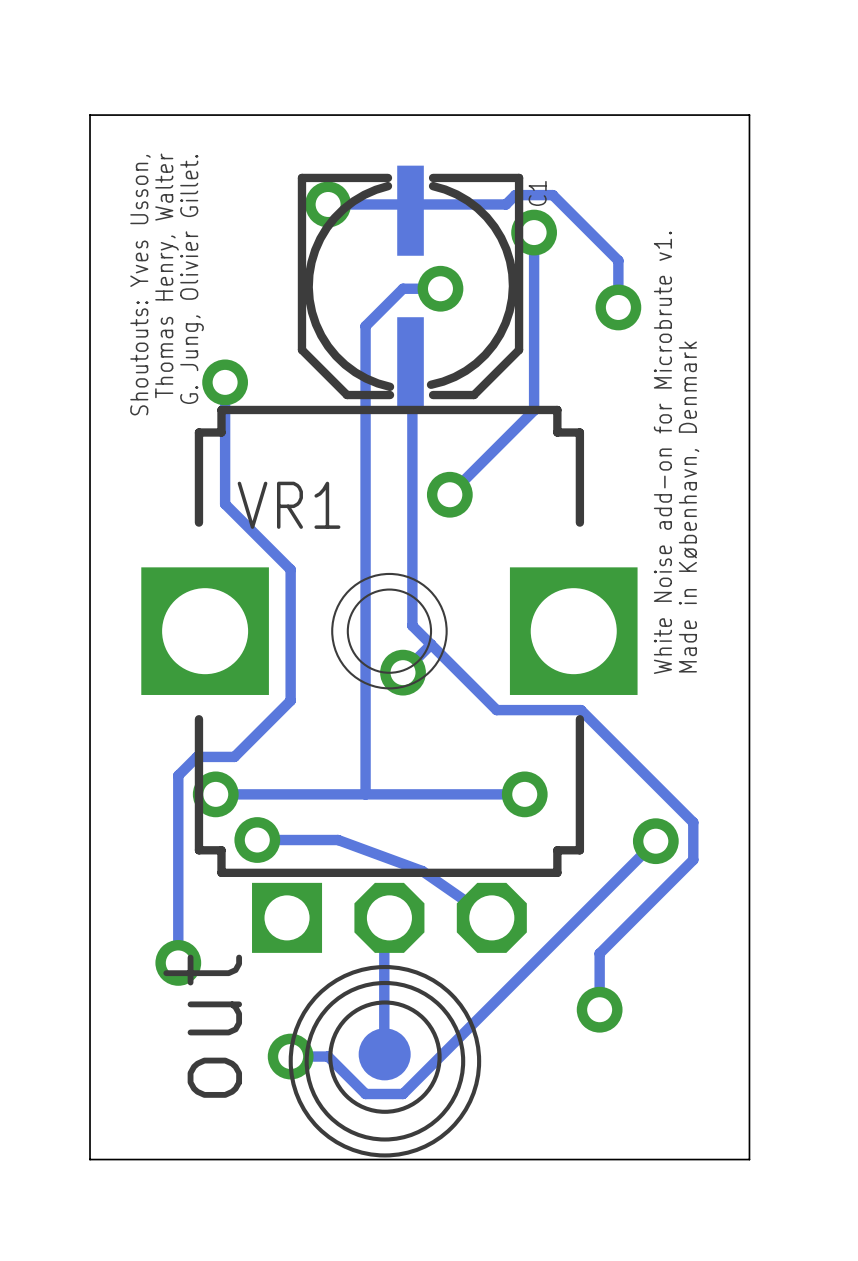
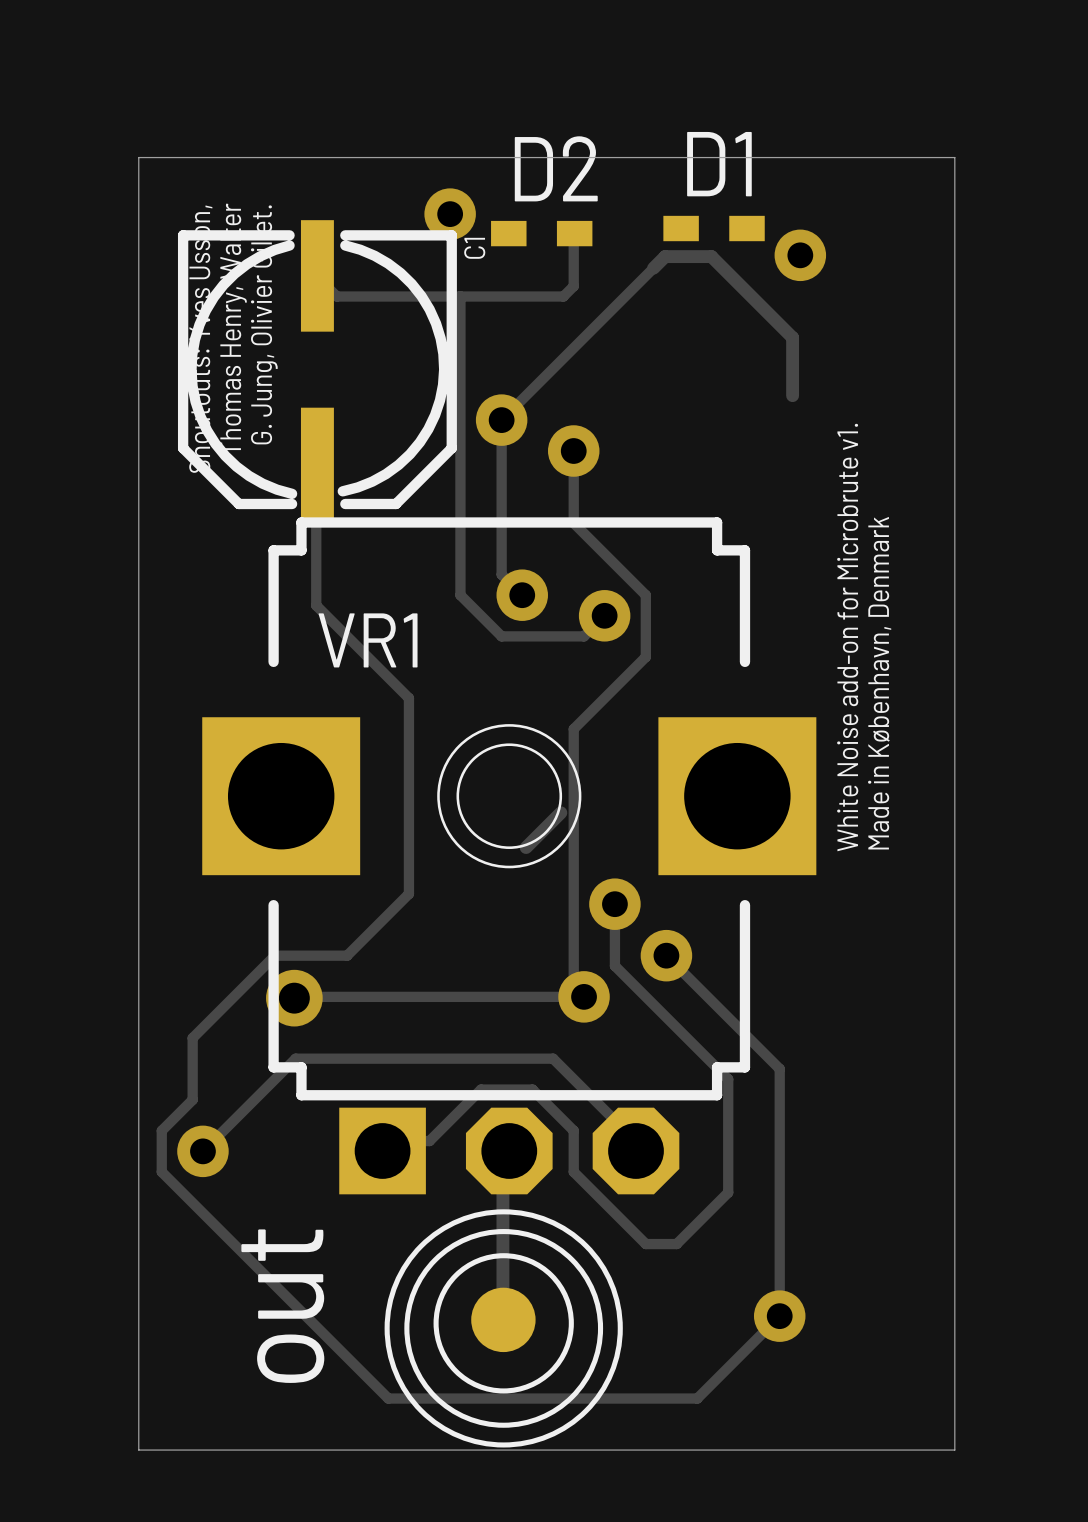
via: none -> (450, 214)
D1: none -> (714, 228)
D2: none -> (541, 233)
track: none -> (574, 233) (573, 286) (563, 296) (336, 296) (317, 275)
via: none -> (800, 255)
via: (328, 204) -> none
track: (506, 204) (412, 204) (410, 210) (403, 204) (328, 204) -> (653, 268) (501, 420) (501, 574) (522, 595)
track: none -> (460, 296) (460, 595) (501, 636) (584, 636) (604, 615)
track: (534, 232) (534, 410) (449, 494) -> none
via: (534, 232) -> none
C1 position: (410, 286) -> (317, 369)
track: (440, 288) (403, 288) (365, 326) (365, 794) -> none
via: (440, 288) -> none
via: (618, 307) -> none
via: none -> (501, 420)
track: none -> (573, 451) (573, 523) (645, 595) (645, 656) (573, 729) (573, 996)
via: none -> (573, 451)
track: none -> (317, 463) (316, 605) (408, 698) (408, 893) (347, 955) (275, 955) (192, 1038) (192, 1099) (161, 1130) (161, 1171) (388, 1398) (697, 1398) (779, 1316) (779, 1068) (666, 955)
track: (410, 362) (412, 363) (412, 625) (496, 710) (580, 710) (693, 822) (693, 859) (599, 953) (599, 1009) -> none
track: (225, 382) (225, 504) (290, 569) (290, 700) (234, 756) (197, 756) (178, 775) (178, 962) -> none
via: (225, 382) -> none
via: none -> (522, 595)
via position: (449, 494) -> (604, 615)
via: (403, 672) -> none
track: none -> (614, 904) (614, 965) (728, 1079) (728, 1192) (676, 1244) (645, 1244) (573, 1171) (573, 1130) (532, 1089) (481, 1089) (429, 1141) (388, 1141) (382, 1151)
via: none -> (614, 904)
via: none -> (584, 996)
track: (524, 794) (215, 794) -> (584, 996) (295, 996)
via position: (524, 794) -> (666, 955)
track: (257, 840) (338, 840) (422, 871) (491, 917) -> (202, 1151) (295, 1058) (553, 1058) (635, 1141) (636, 1151)
via: (257, 840) -> none
track: (655, 841) (403, 1094) (365, 1094) (328, 1056) (290, 1056) -> none
via: (655, 841) -> none
via: none -> (202, 1151)
via: (178, 962) -> none
via: (599, 1009) -> none
via: none -> (779, 1316)
via: (290, 1056) -> none

